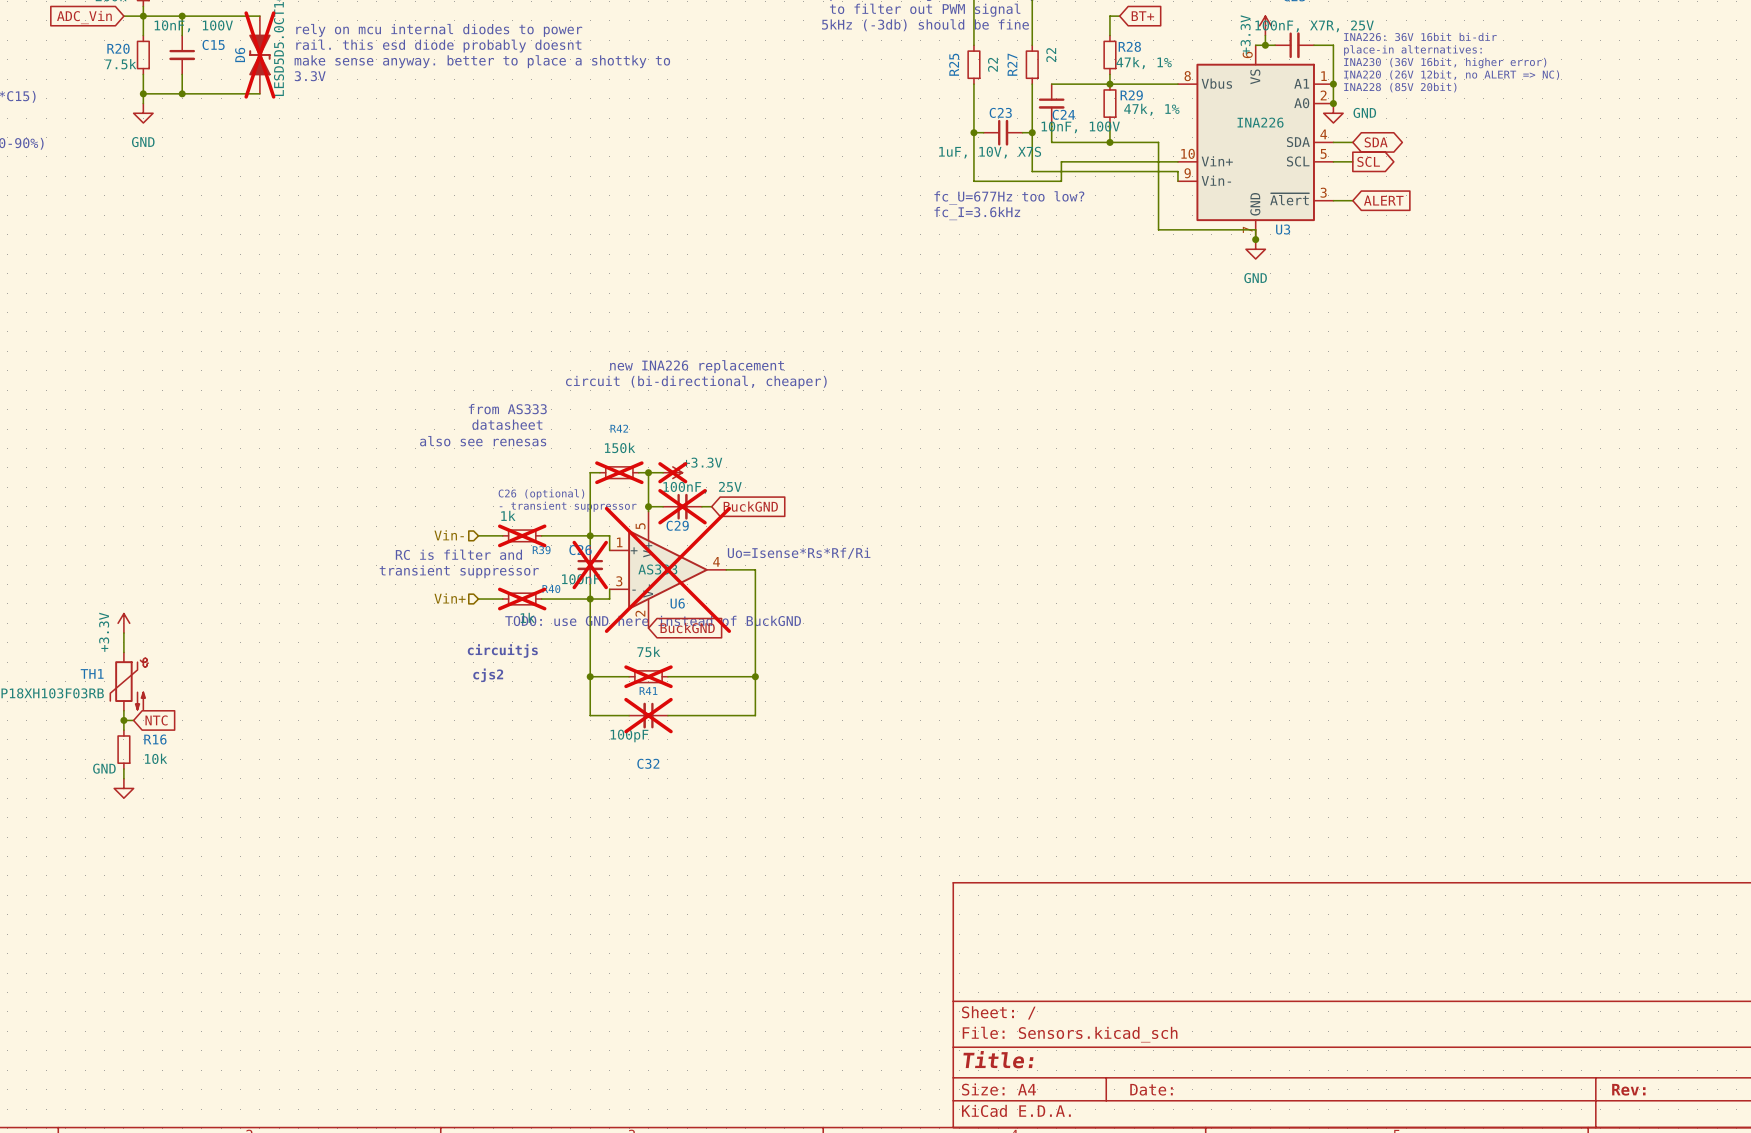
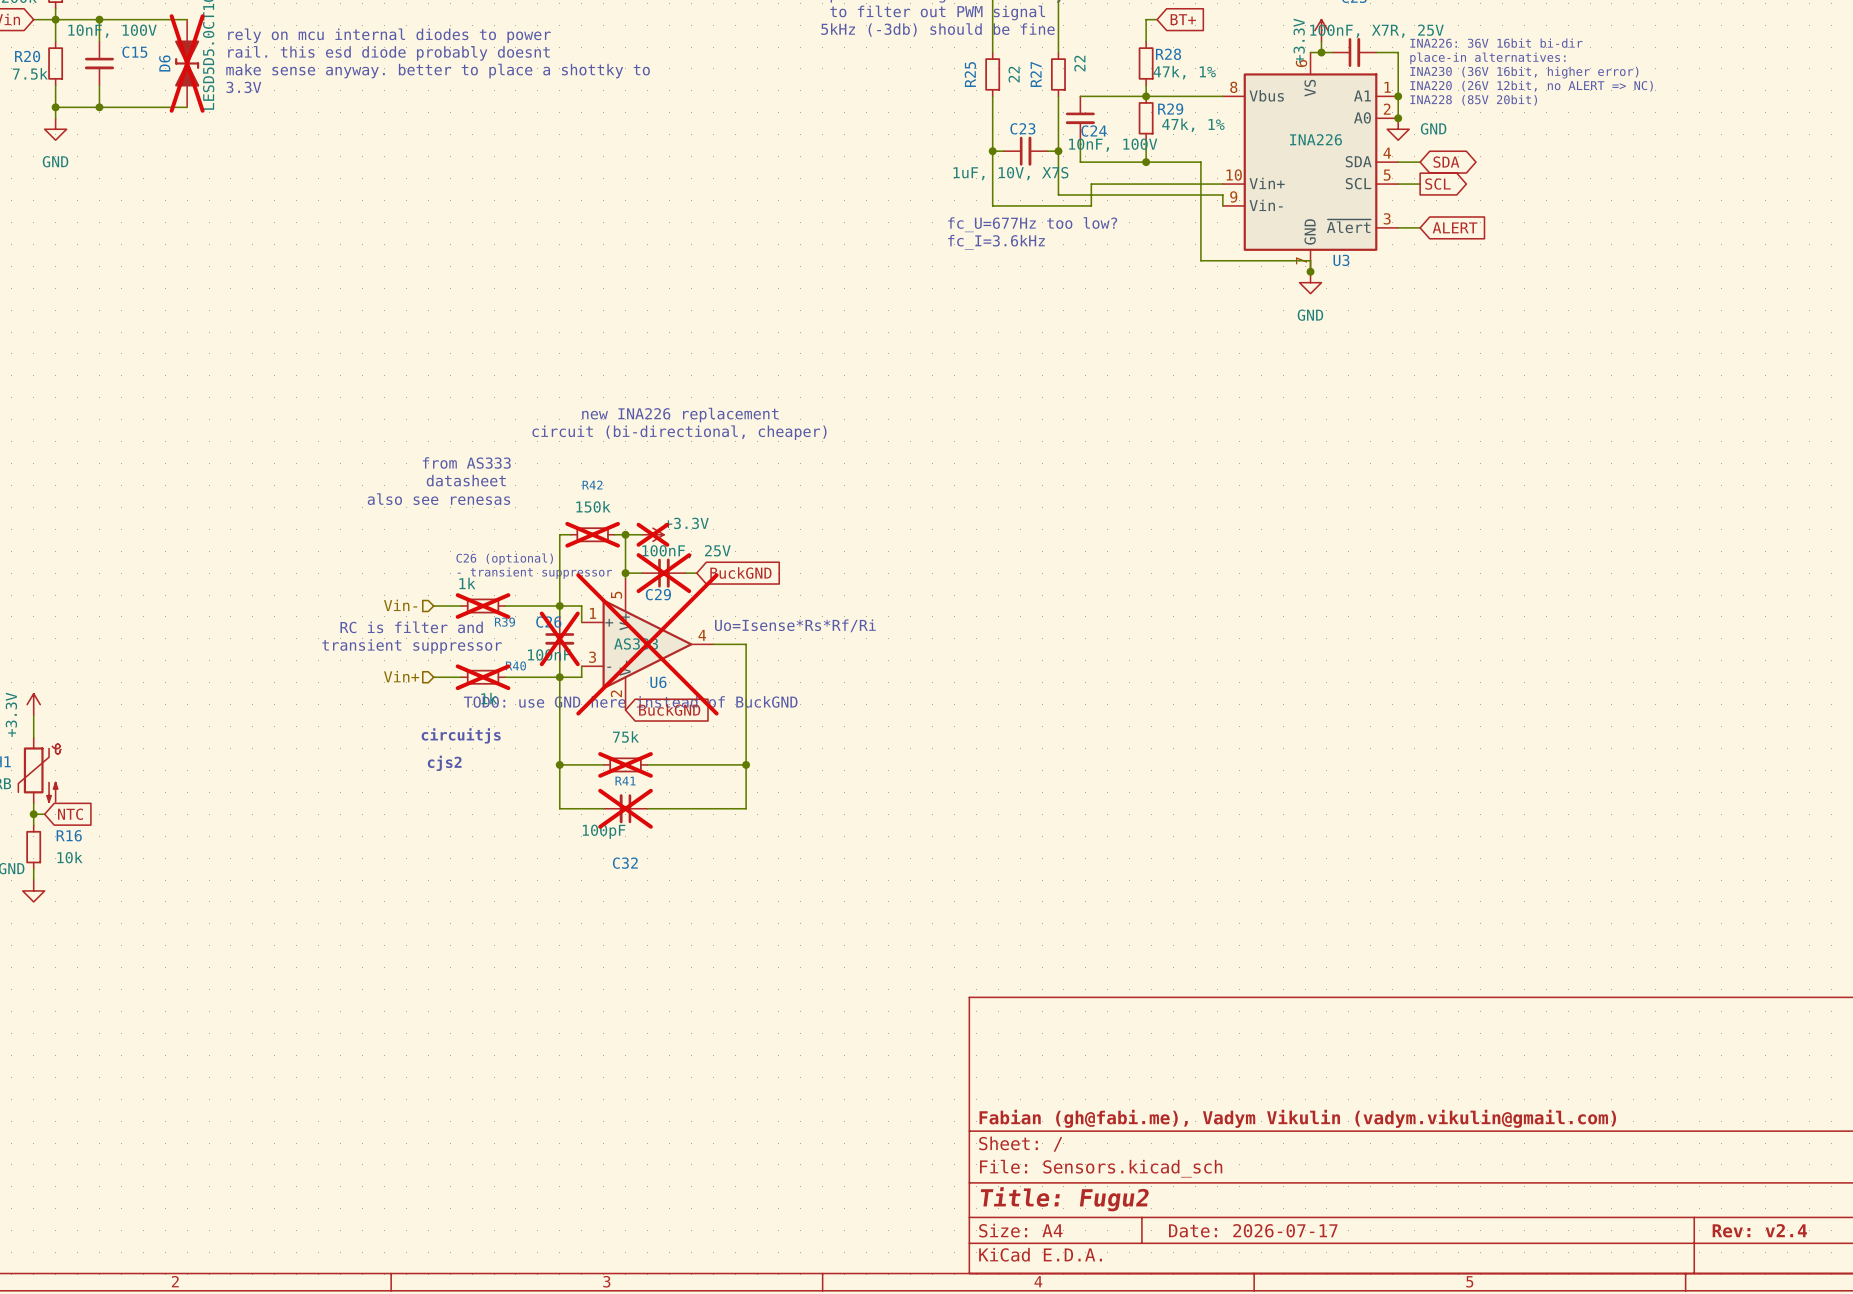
title block: none -> Fabian (gh@fabi.me), Vadym Vikulin (vadym.vikulin@gmail.com) (1297, 1118)
title block: Title: (998, 1059) -> Title: Fugu2 (1064, 1199)
title block: Date: (1151, 1089) -> Date: 2026-07-17 (1253, 1230)
title block: Rev: (1628, 1089) -> Rev: v2.4 (1759, 1230)

